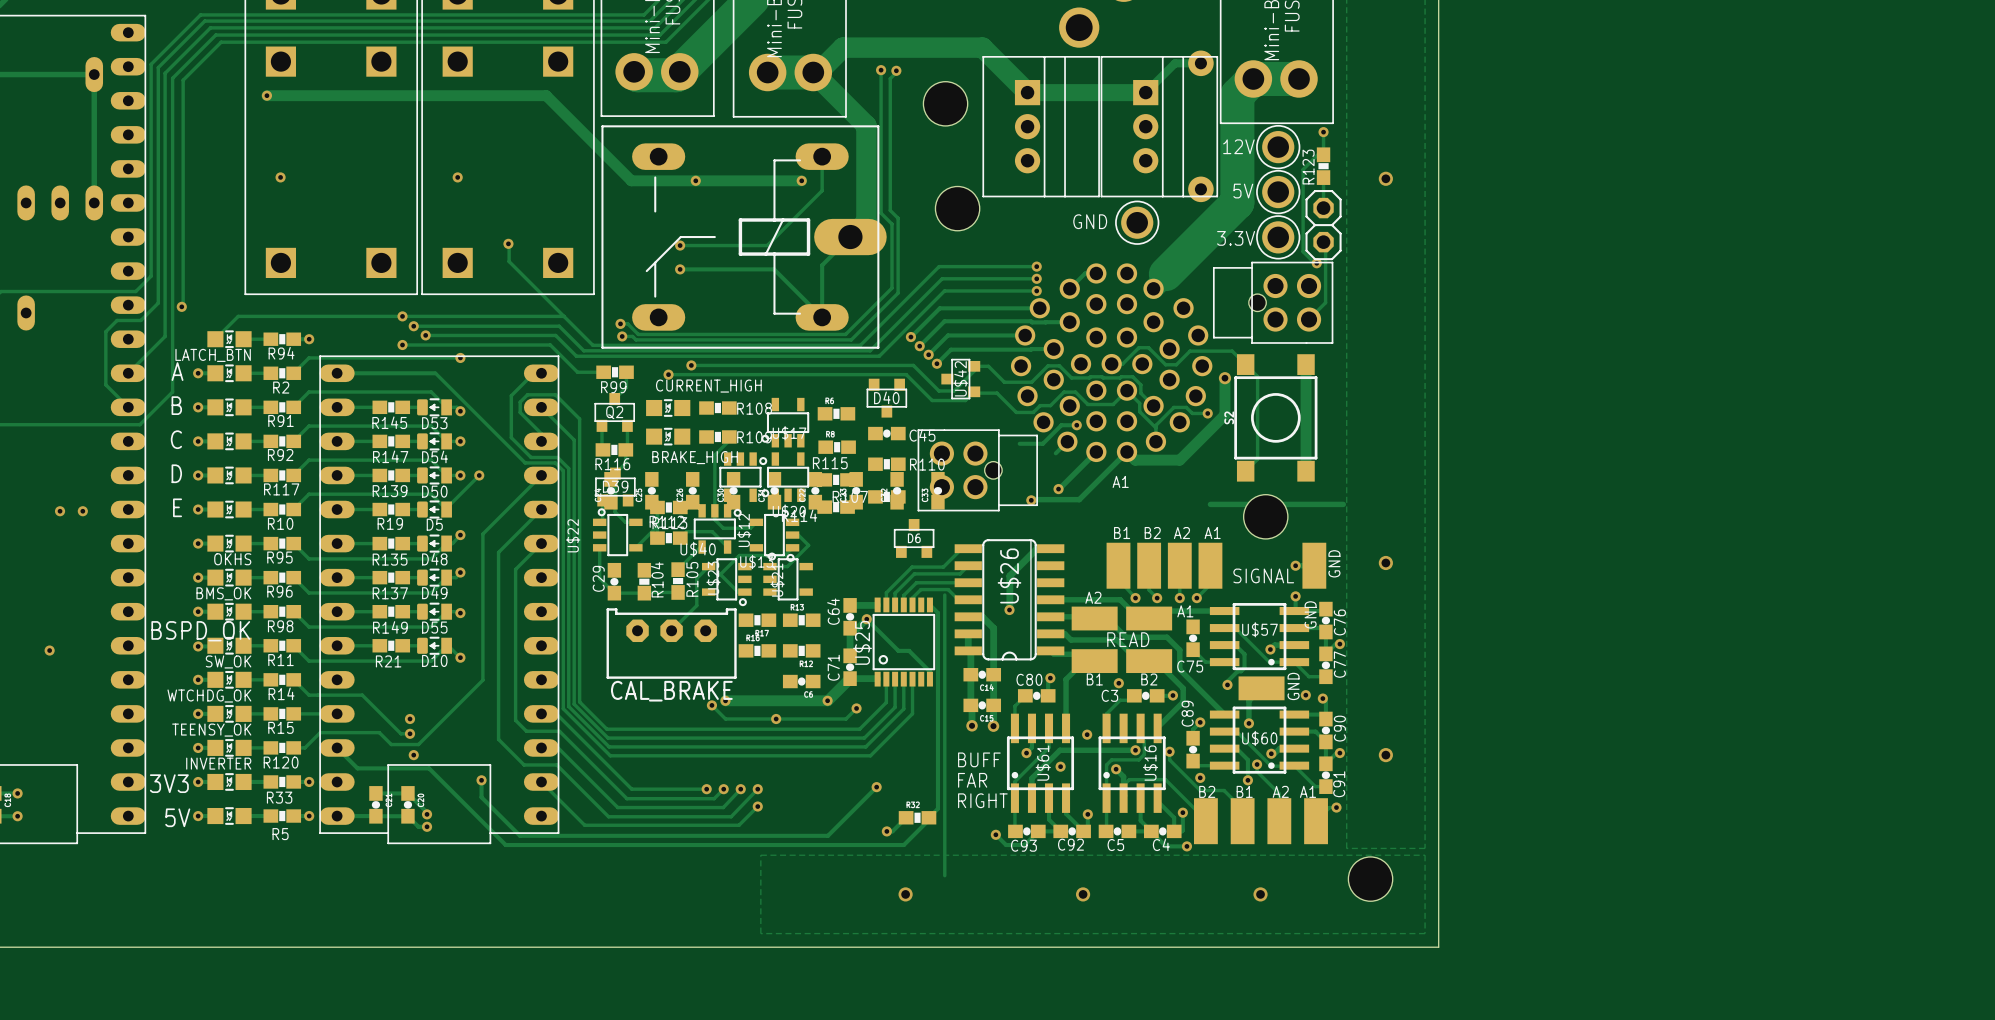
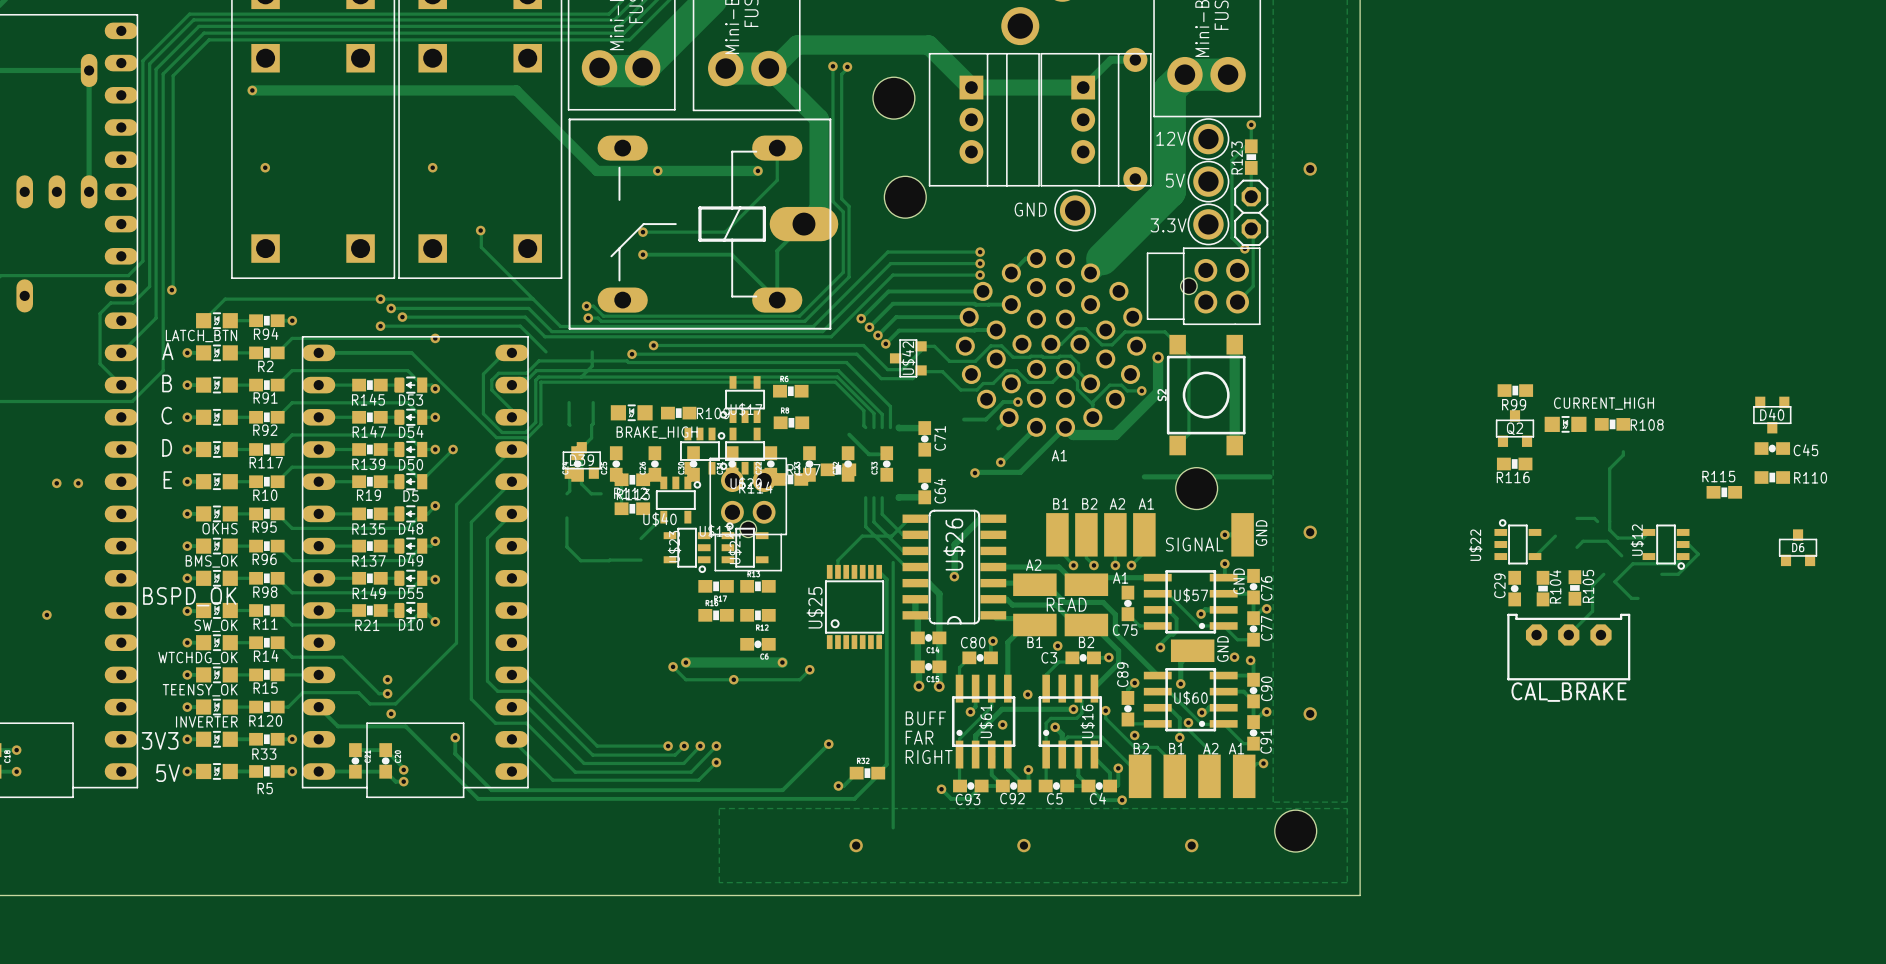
track: (577, 372) (603, 372) -> none
R99 position: (615, 372) -> (1515, 390)
track: (555, 394) (579, 419) (579, 701) (606, 729) (859, 729) (886, 702) (886, 679) -> (525, 373) (538, 360) (846, 362) (890, 406) (890, 427)
D40 position: (886, 398) -> (1772, 415)
track: (541, 407) (574, 440) (574, 704) (608, 738) (864, 738) (895, 707) (895, 679) -> (511, 385) (518, 378) (528, 378) (536, 370) (838, 370) (882, 414) (882, 427)
CURRENT_HIGH: (668, 408) -> none
R108 position: (717, 408) -> (1612, 424)
Q2 position: (614, 412) -> (1515, 428)
C45 position: (886, 433) -> (1772, 448)
track: (729, 436) (729, 440) (714, 455) (714, 519) (723, 528) (750, 528) (756, 522) -> none
CURRENT_HIGH: none -> (1565, 424)
R116 position: (614, 449) -> (1514, 463)
track: none -> (898, 427) (924, 428)
track: (555, 457) (568, 468) (568, 706) (609, 746) (865, 746) (903, 708) (903, 679) -> (525, 432) (535, 422) (535, 380) (538, 377) (837, 377) (873, 413) (873, 427)
track: none -> (849, 434) (868, 454) (879, 454)
track: (556, 463) (563, 470) (563, 708) (610, 755) (870, 755) (912, 713) (912, 679) -> (525, 438) (540, 424) (541, 382) (835, 382) (863, 410) (863, 425) (865, 427)
R110 position: (886, 464) -> (1772, 477)
part rotation: 0° (977, 470) -> 90° clockwise (748, 514)
part position: (977, 470) -> (748, 514)
track: none -> (1623, 451) (1623, 455) (1609, 468) (1609, 530) (1617, 538) (1643, 538) (1648, 532)
R115 position: (836, 479) -> (1724, 492)
track: (657, 526) (635, 547) -> none
track: none -> (924, 497) (898, 497)
U$22 position: (617, 532) -> (1517, 541)
track: (792, 535) (798, 535) (808, 545) (787, 566) (769, 566) -> none
U$12 position: (774, 537) -> (1666, 547)
track: (680, 538) (686, 531) (712, 531) (727, 547) -> none
D6 position: (914, 538) -> (1798, 547)
track: (792, 547) (784, 555) (739, 555) (720, 574) (738, 592) (744, 592) -> none
track: none -> (1576, 518) (1594, 518) (1597, 521)
track: (968, 565) (960, 573) (914, 573) (895, 593) (895, 604) -> (915, 534) (902, 534) (882, 514) (882, 497)
track: (708, 566) (696, 578) (696, 605) (671, 630) -> none
track: none -> (1555, 536) (1535, 556)
track: none -> (1683, 544) (1688, 544) (1698, 554) (1678, 574) (1661, 574)
track: none -> (1576, 547) (1583, 541) (1607, 541) (1621, 555)
C29 position: (614, 581) -> (1514, 588)
R104 position: (644, 581) -> (1543, 588)
R105 position: (678, 581) -> (1574, 587)
track: (954, 582) (916, 582) (903, 595) (903, 604) -> (902, 550) (873, 522) (873, 497)
track: none -> (1683, 556) (1675, 563) (1632, 563) (1614, 581) (1631, 598) (1638, 598)
track: (948, 589) (920, 589) (912, 597) (912, 604) -> (896, 557) (865, 526) (865, 497)
track: (877, 604) (850, 605) -> none
track: none -> (1603, 574) (1592, 585) (1592, 611) (1568, 634)
C64 name position: C64 (833, 611) -> C64 (939, 490)
C64 position: (850, 616) -> (924, 486)
via: (866, 619) -> none
CAL_BRAKE: (671, 643) -> none
track: (850, 655) (850, 628) (857, 628) (866, 619) (898, 650) (909, 650) (929, 671) -> none
C71 name position: C71 (833, 667) -> C71 (940, 438)
C71 position: (850, 667) -> (924, 438)
track: (877, 679) (850, 678) (827, 700) -> none
CAL_BRAKE: none -> (1568, 647)

